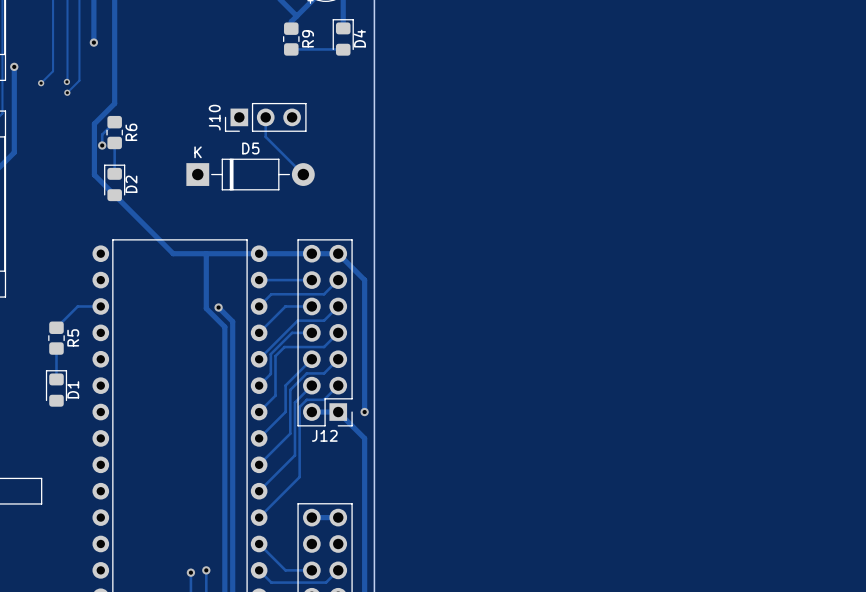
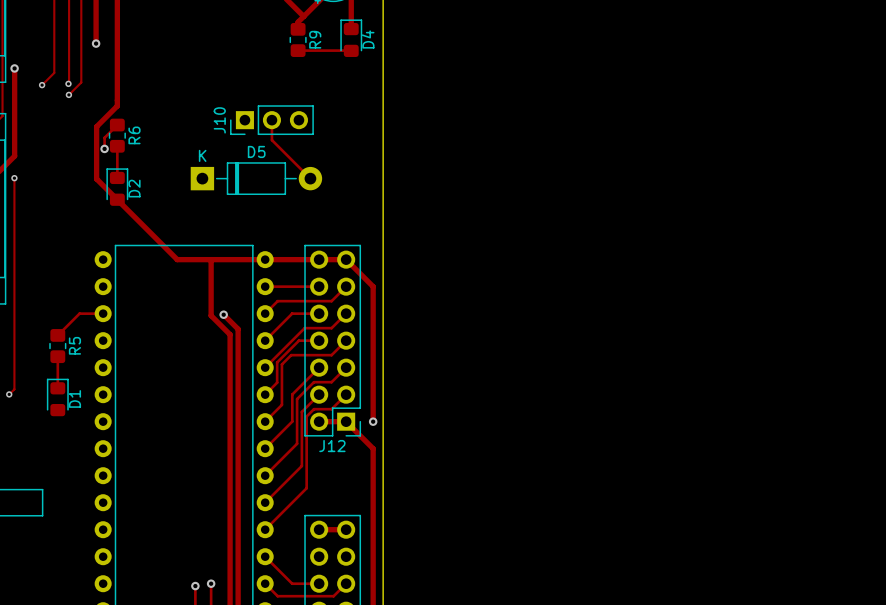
track: none -> (14, 178) (14, 389) (9, 394)
via: none -> (14, 178)
via: none -> (9, 394)

